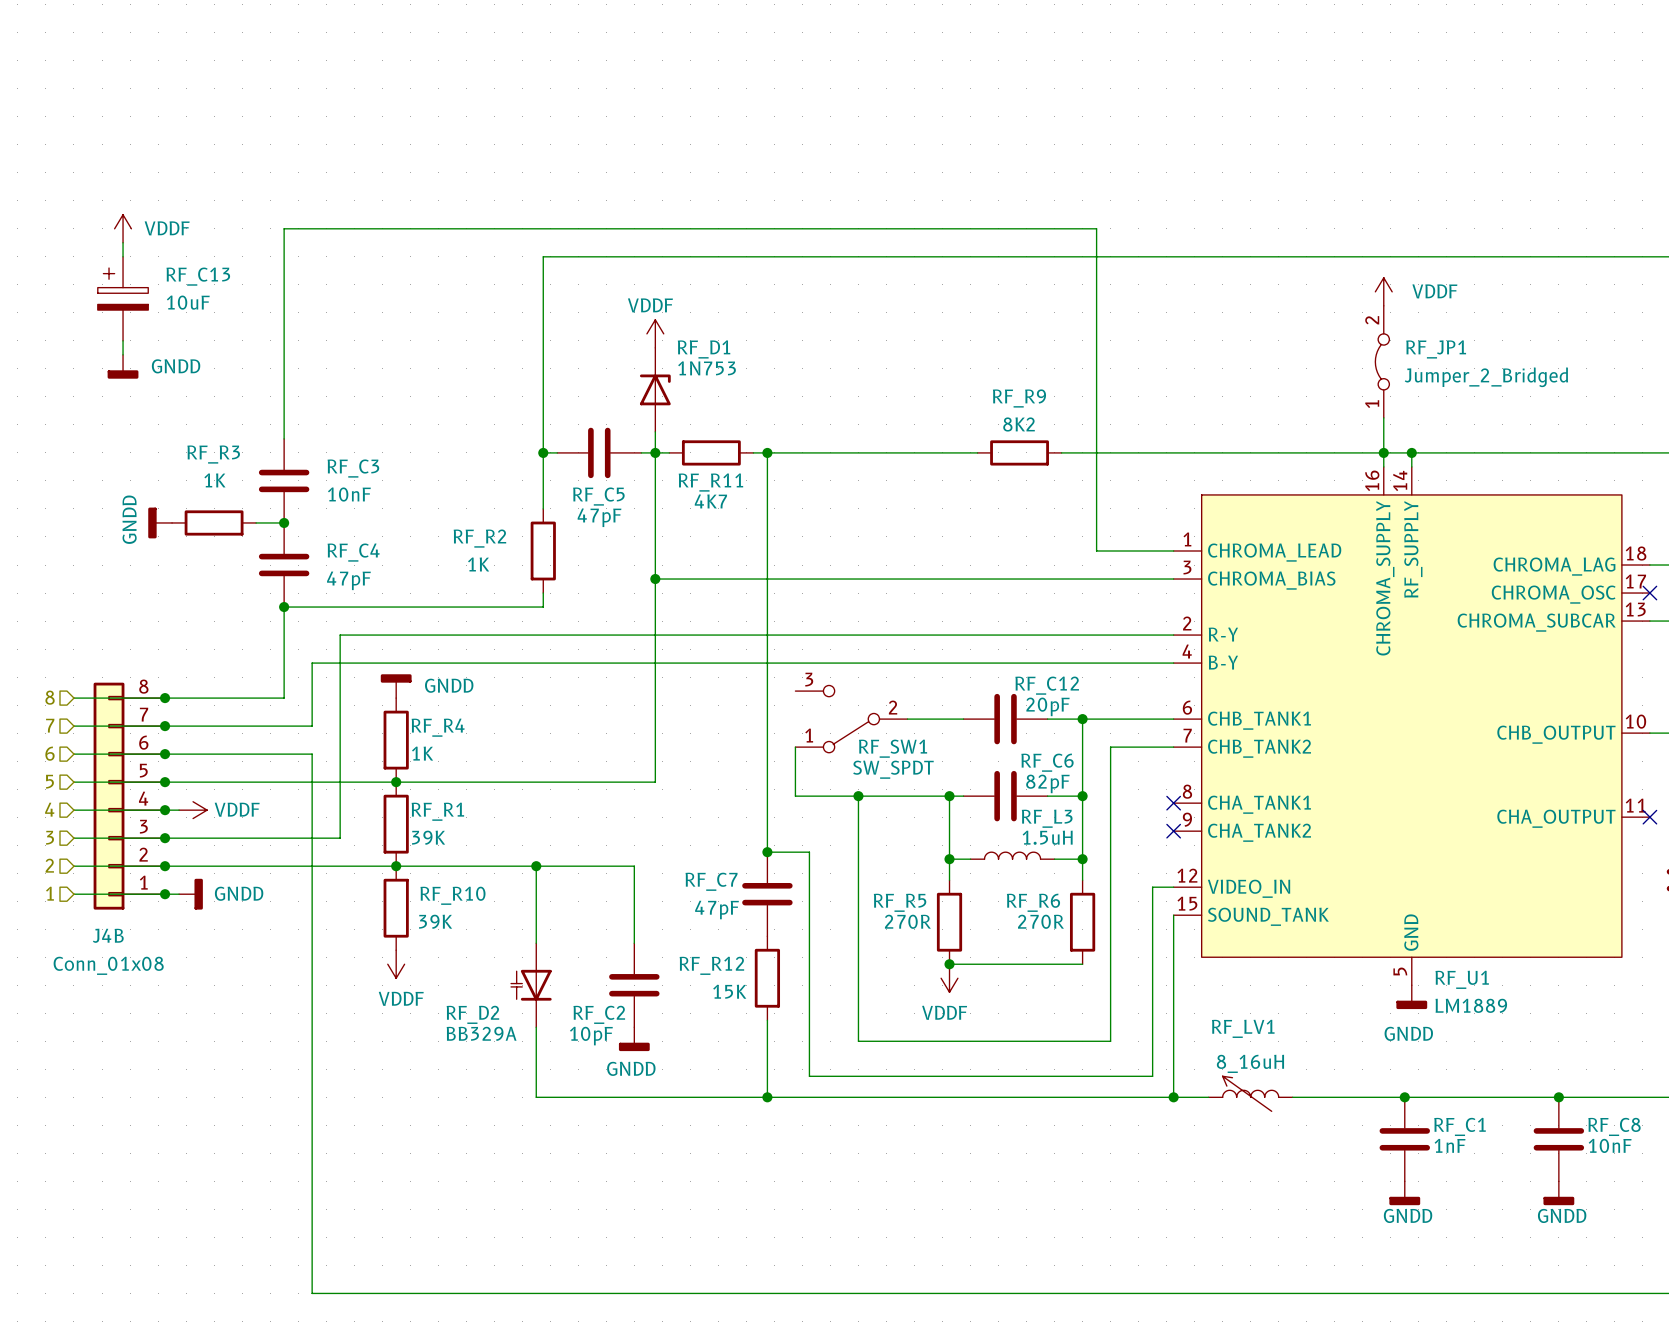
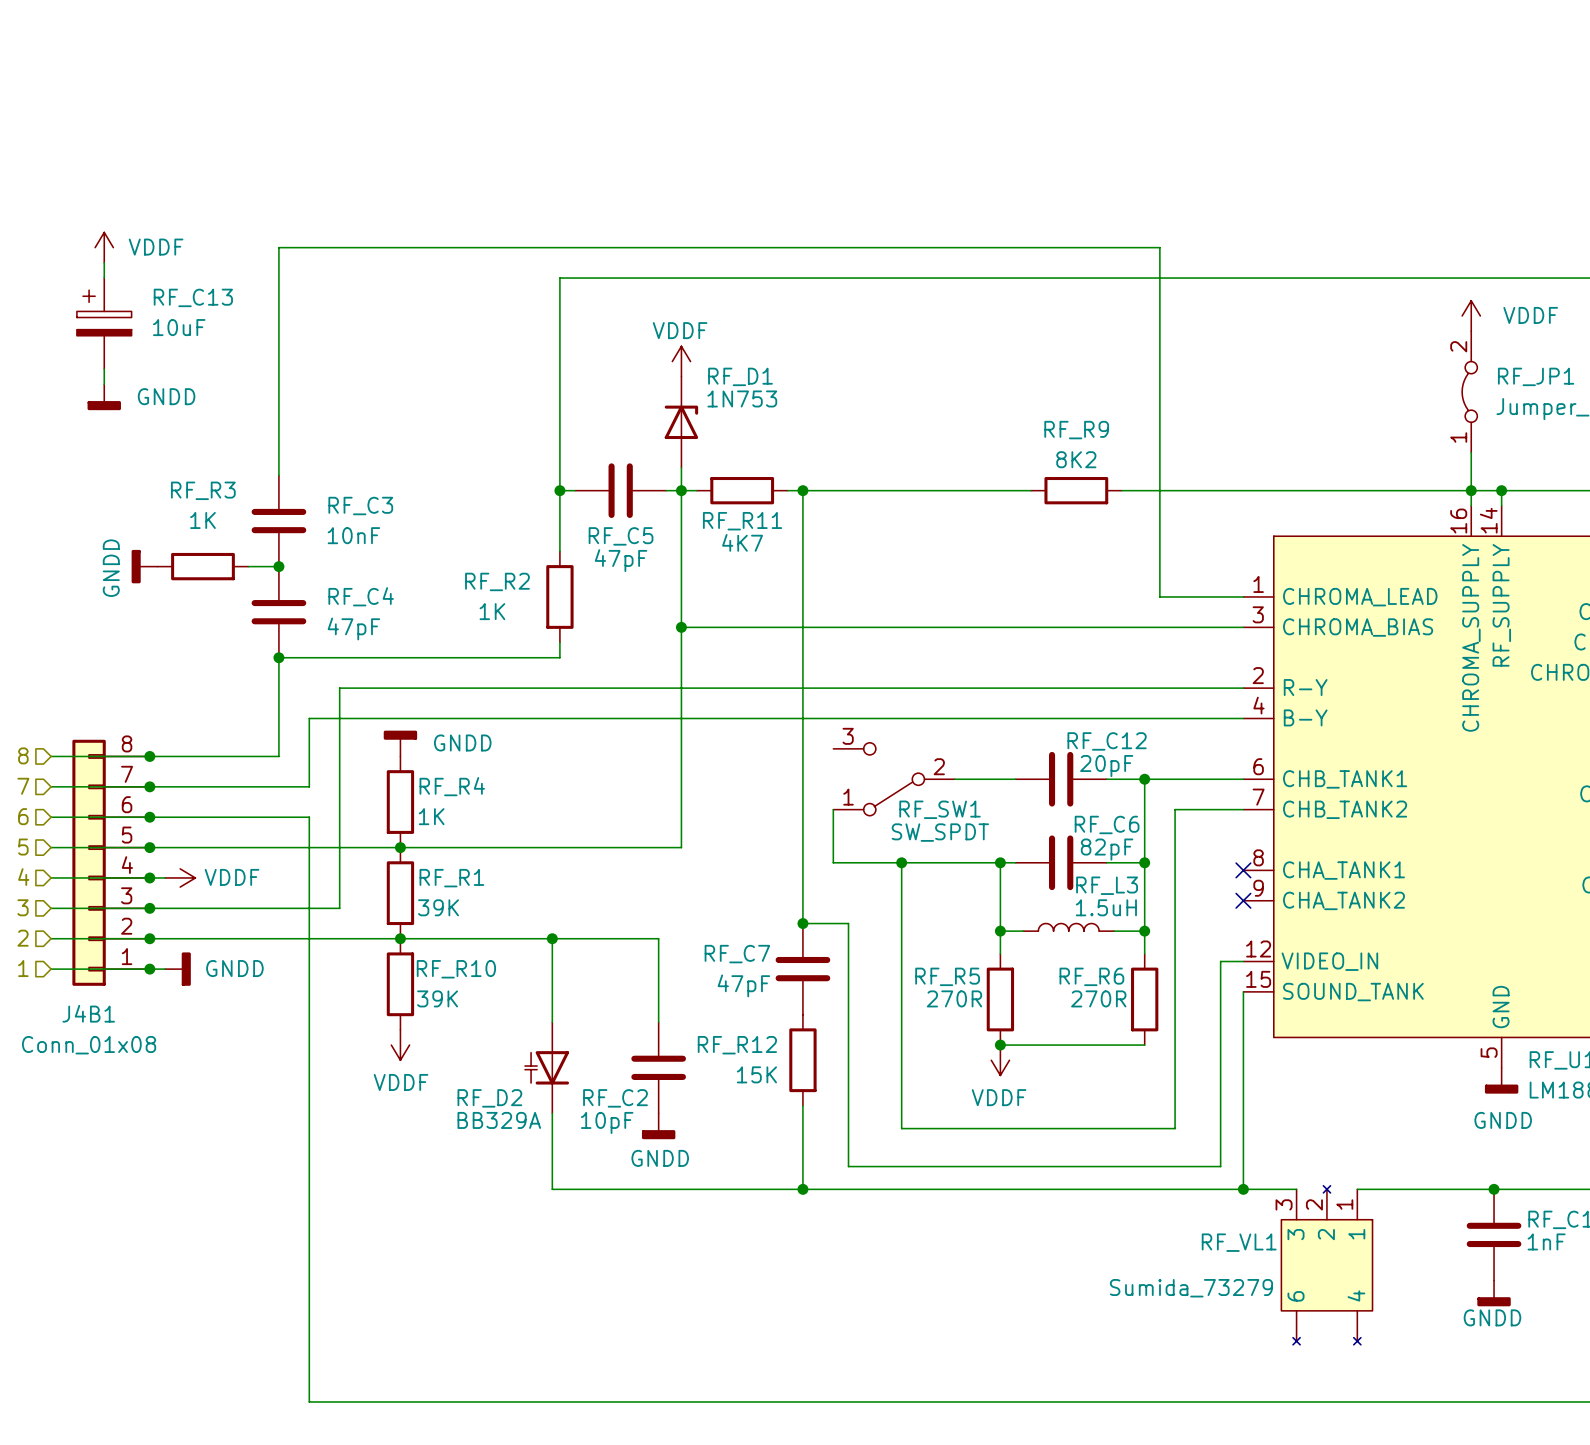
J4B name: J4B (108, 935) -> J4B1 (88, 1013)
RF_LV1: 8_16uH (1250, 1093) -> none
RF_VL1: none -> Sumida_73279 (1326, 1265)

